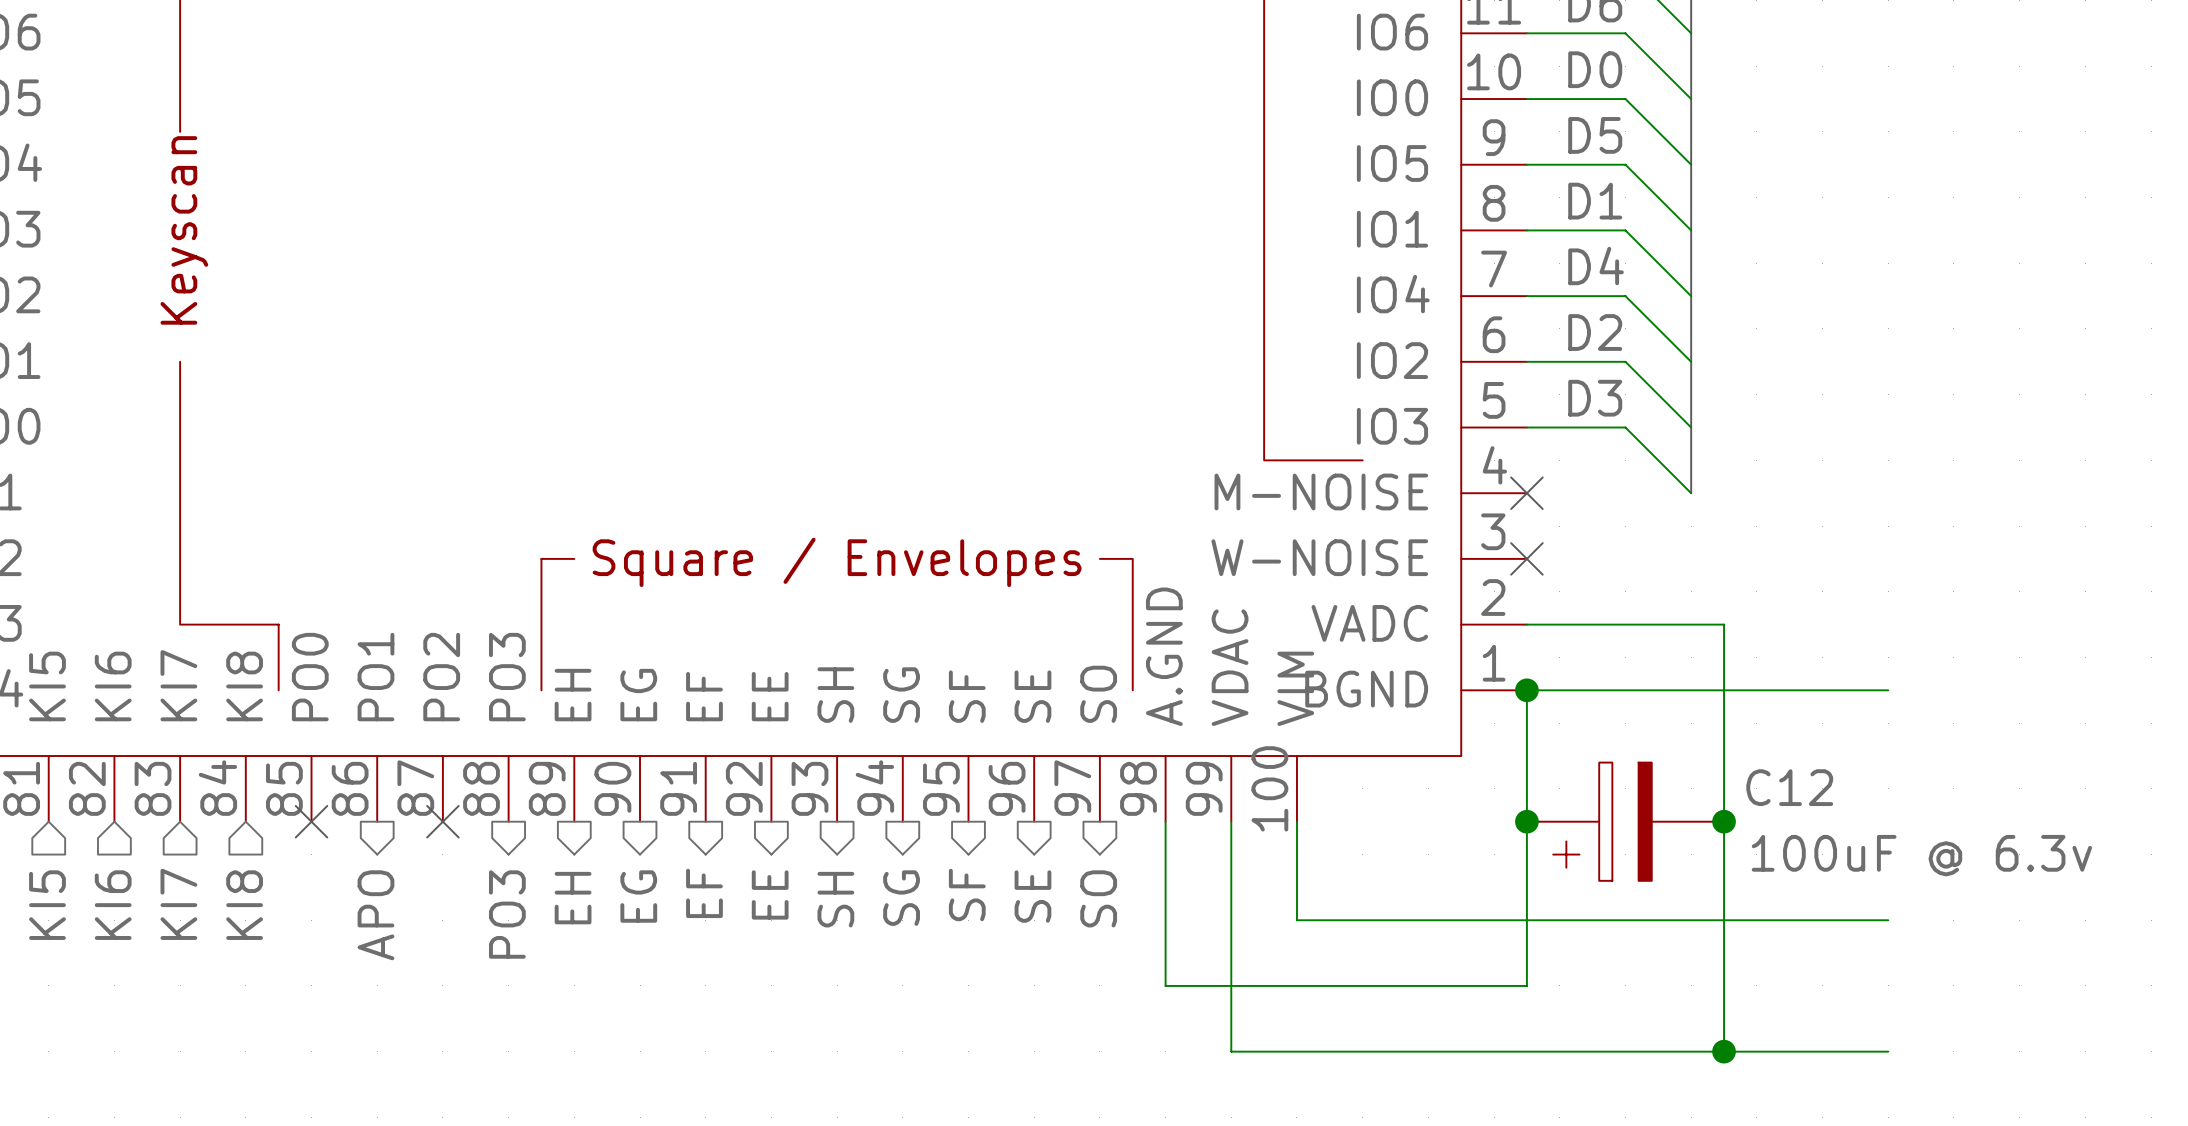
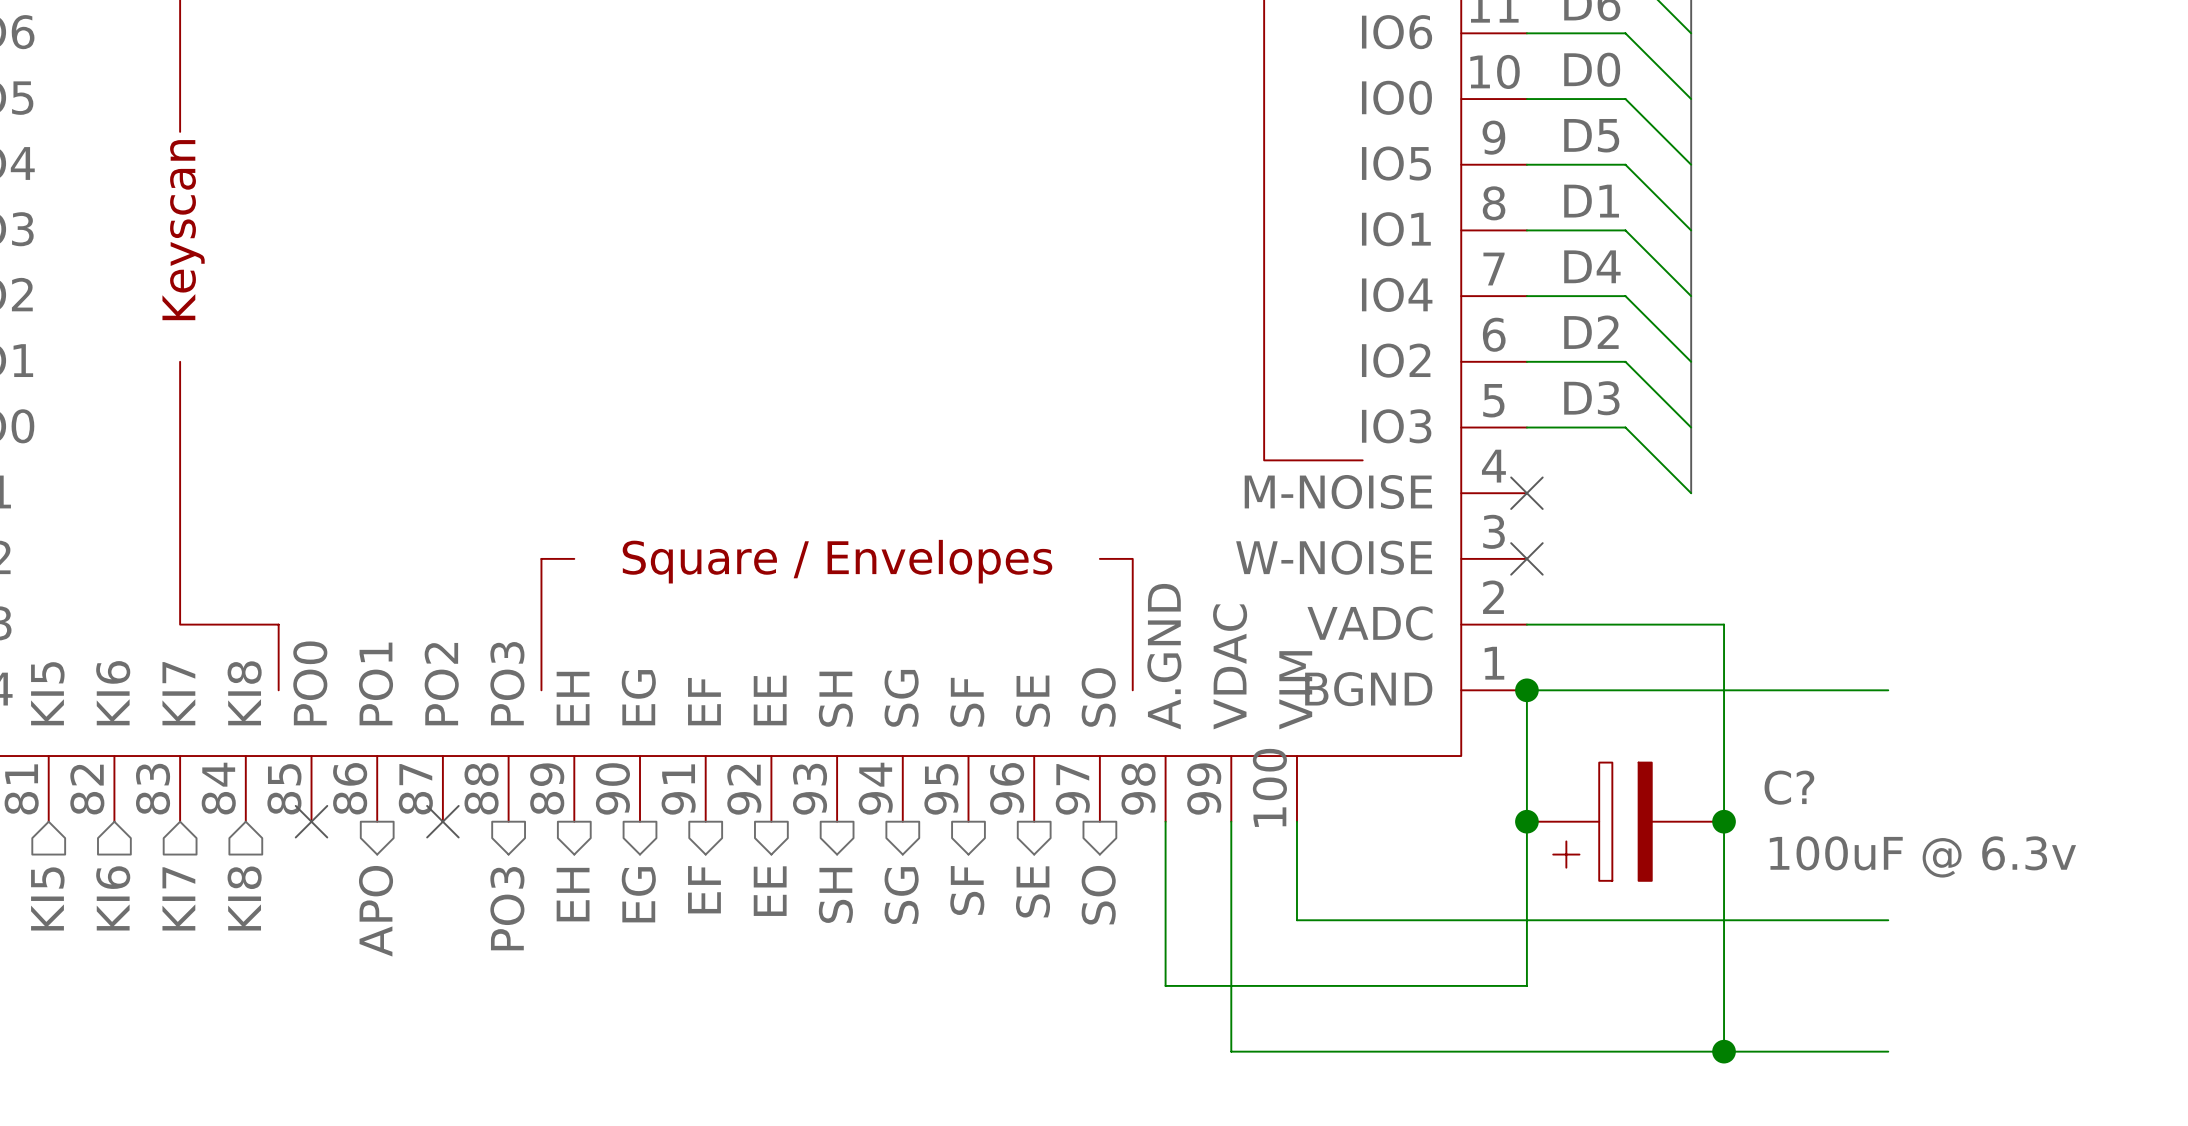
C12 name: C12 (1789, 787) -> C? (1789, 787)

